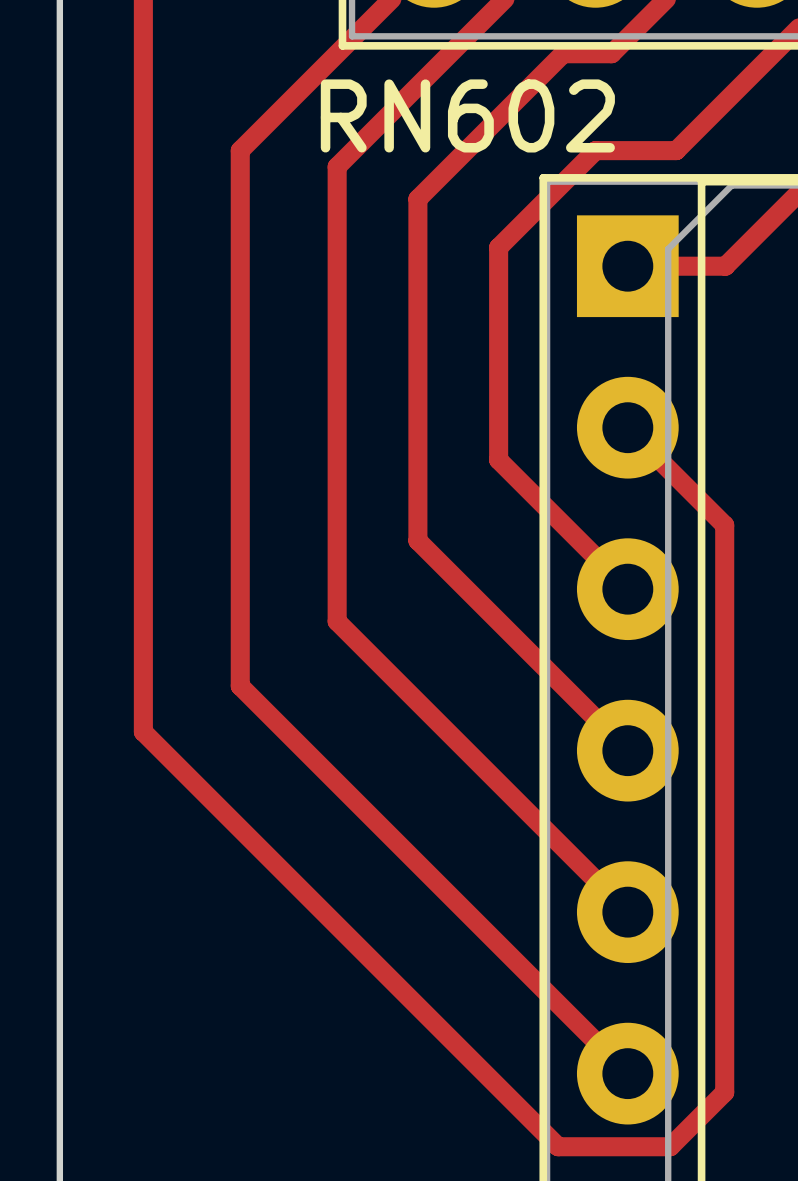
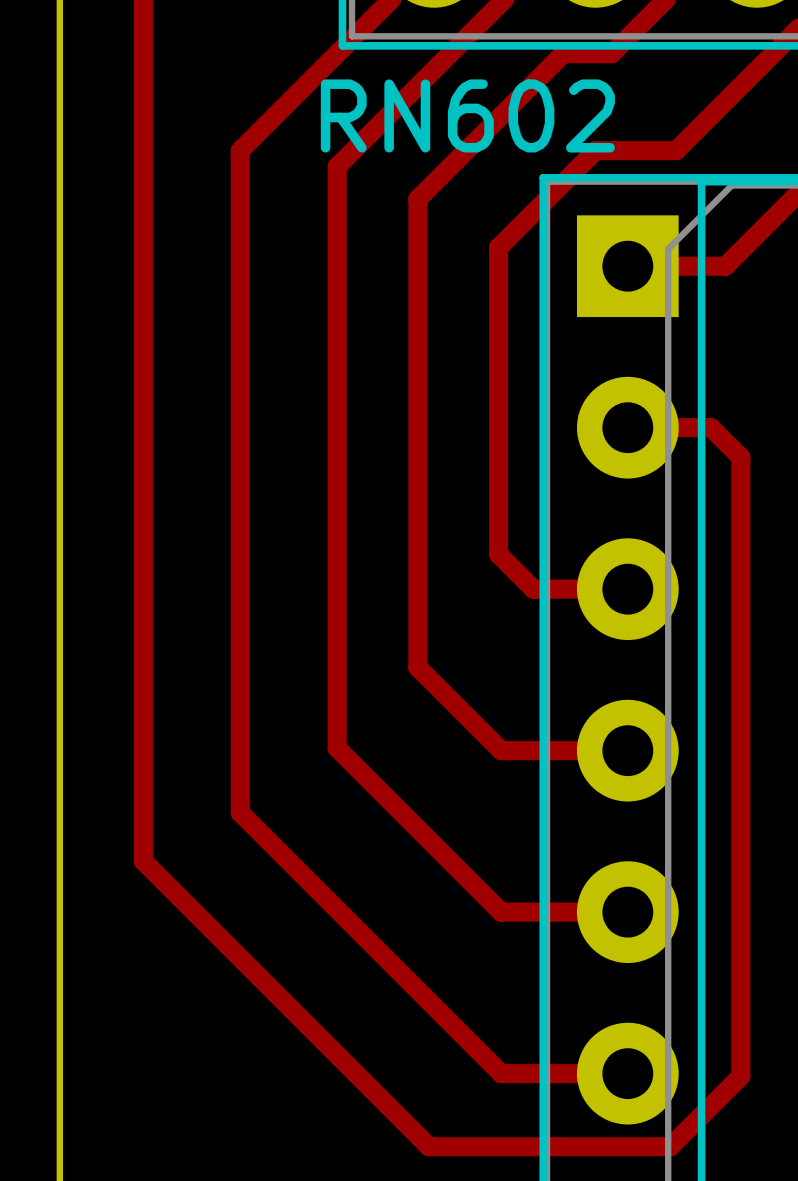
top track: (627, 427) (724, 525) (724, 1092) -> (627, 427) (711, 427) (740, 457) (740, 1076) (724, 1092)
top track: (498, 459) (627, 589) -> (498, 459) (498, 554) (533, 589) (627, 589)
top track: (417, 540) (627, 750) -> (417, 540) (417, 667) (501, 750) (627, 750)
top track: (337, 621) (627, 912) -> (337, 621) (337, 748) (501, 912) (627, 912)
top track: (240, 686) (627, 1073) -> (240, 686) (240, 812) (501, 1073) (627, 1073)
top track: (143, 731) (558, 1146) -> (143, 731) (143, 861) (428, 1146) (558, 1146)

